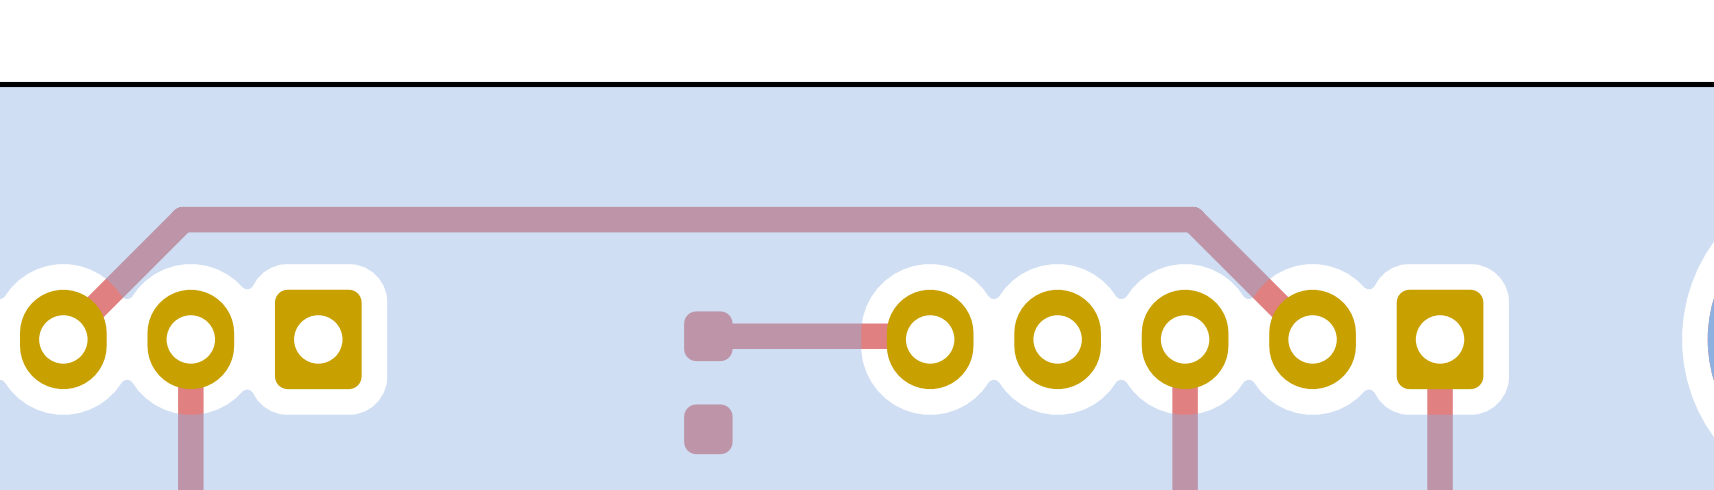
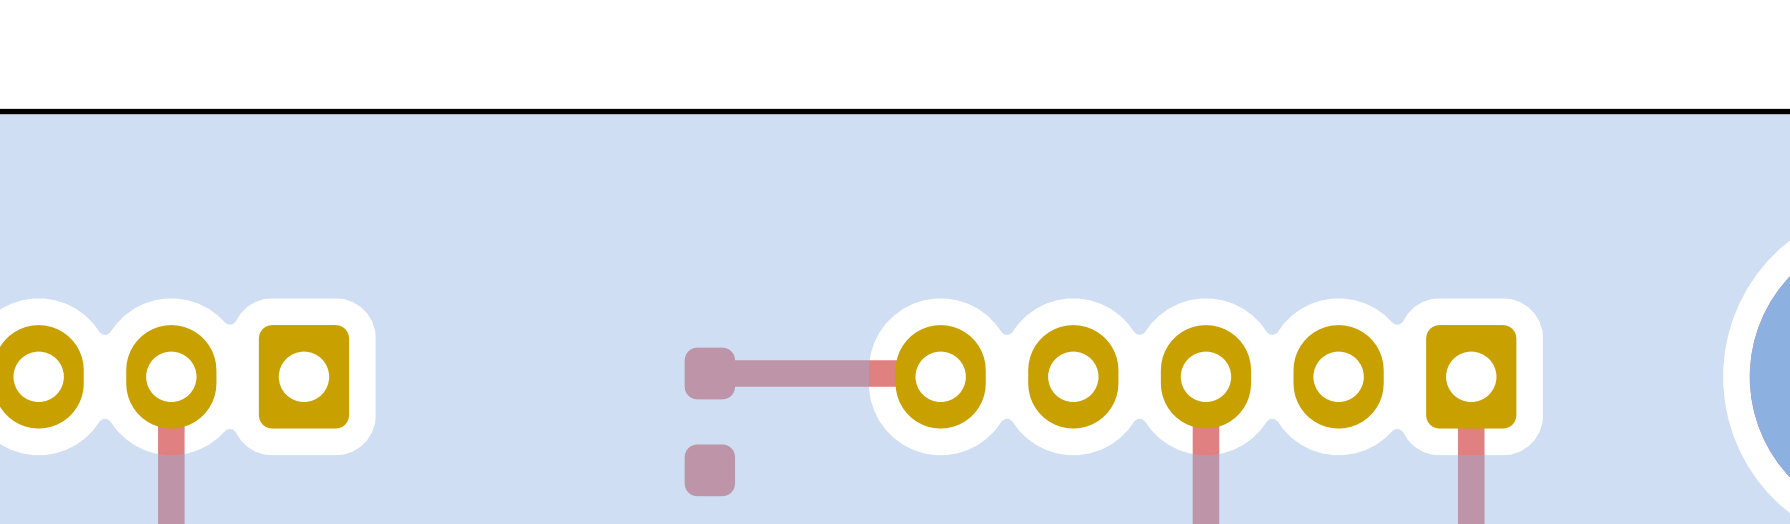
top track: (1312, 339) (1192, 219) (183, 219) (63, 339) -> none

